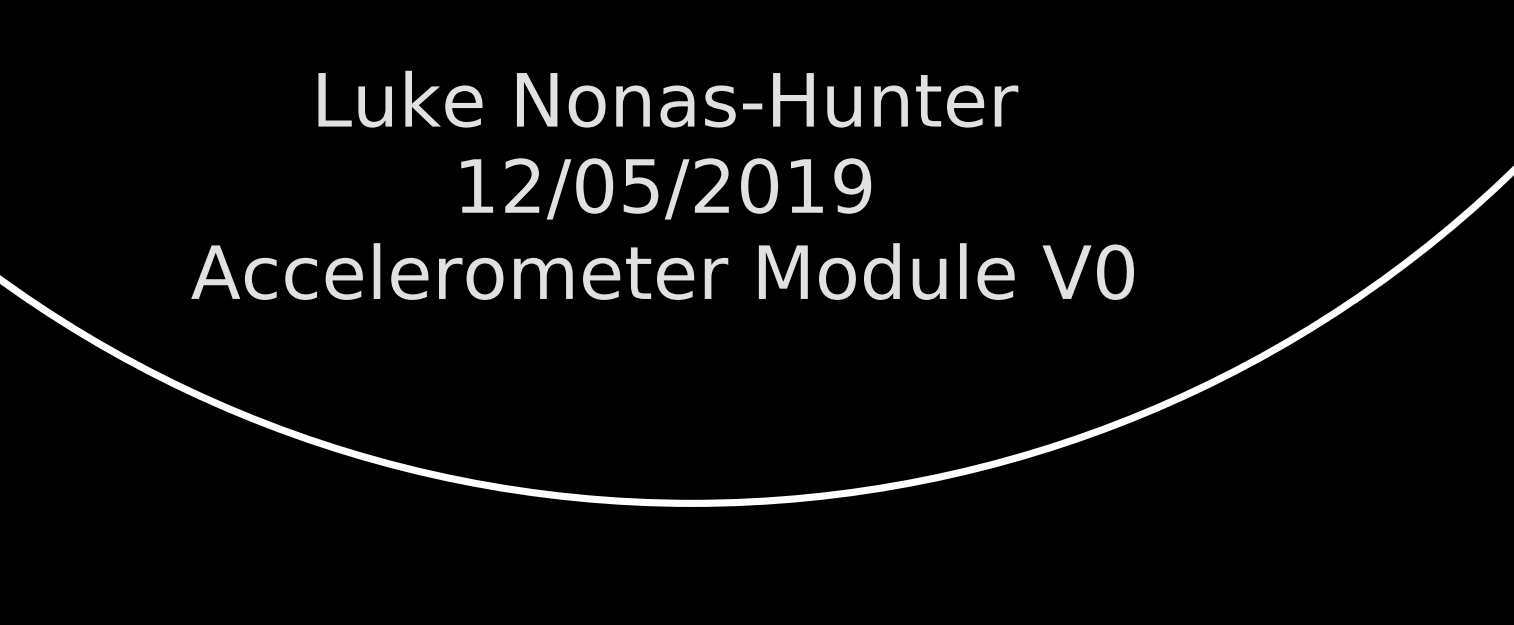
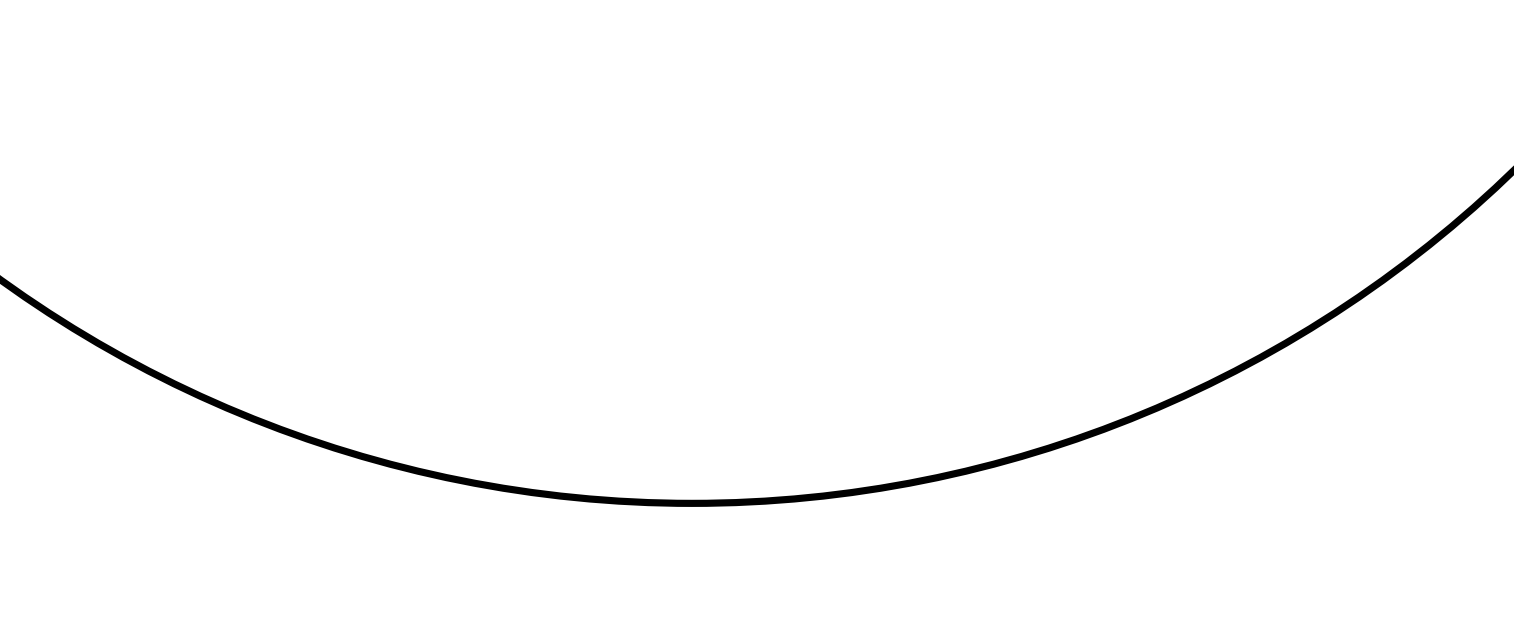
text: Luke Nonas-Hunter (668, 99) -> none
text: 12/05/2019 (666, 188) -> none
text: Accelerometer Module V0 (662, 271) -> none

